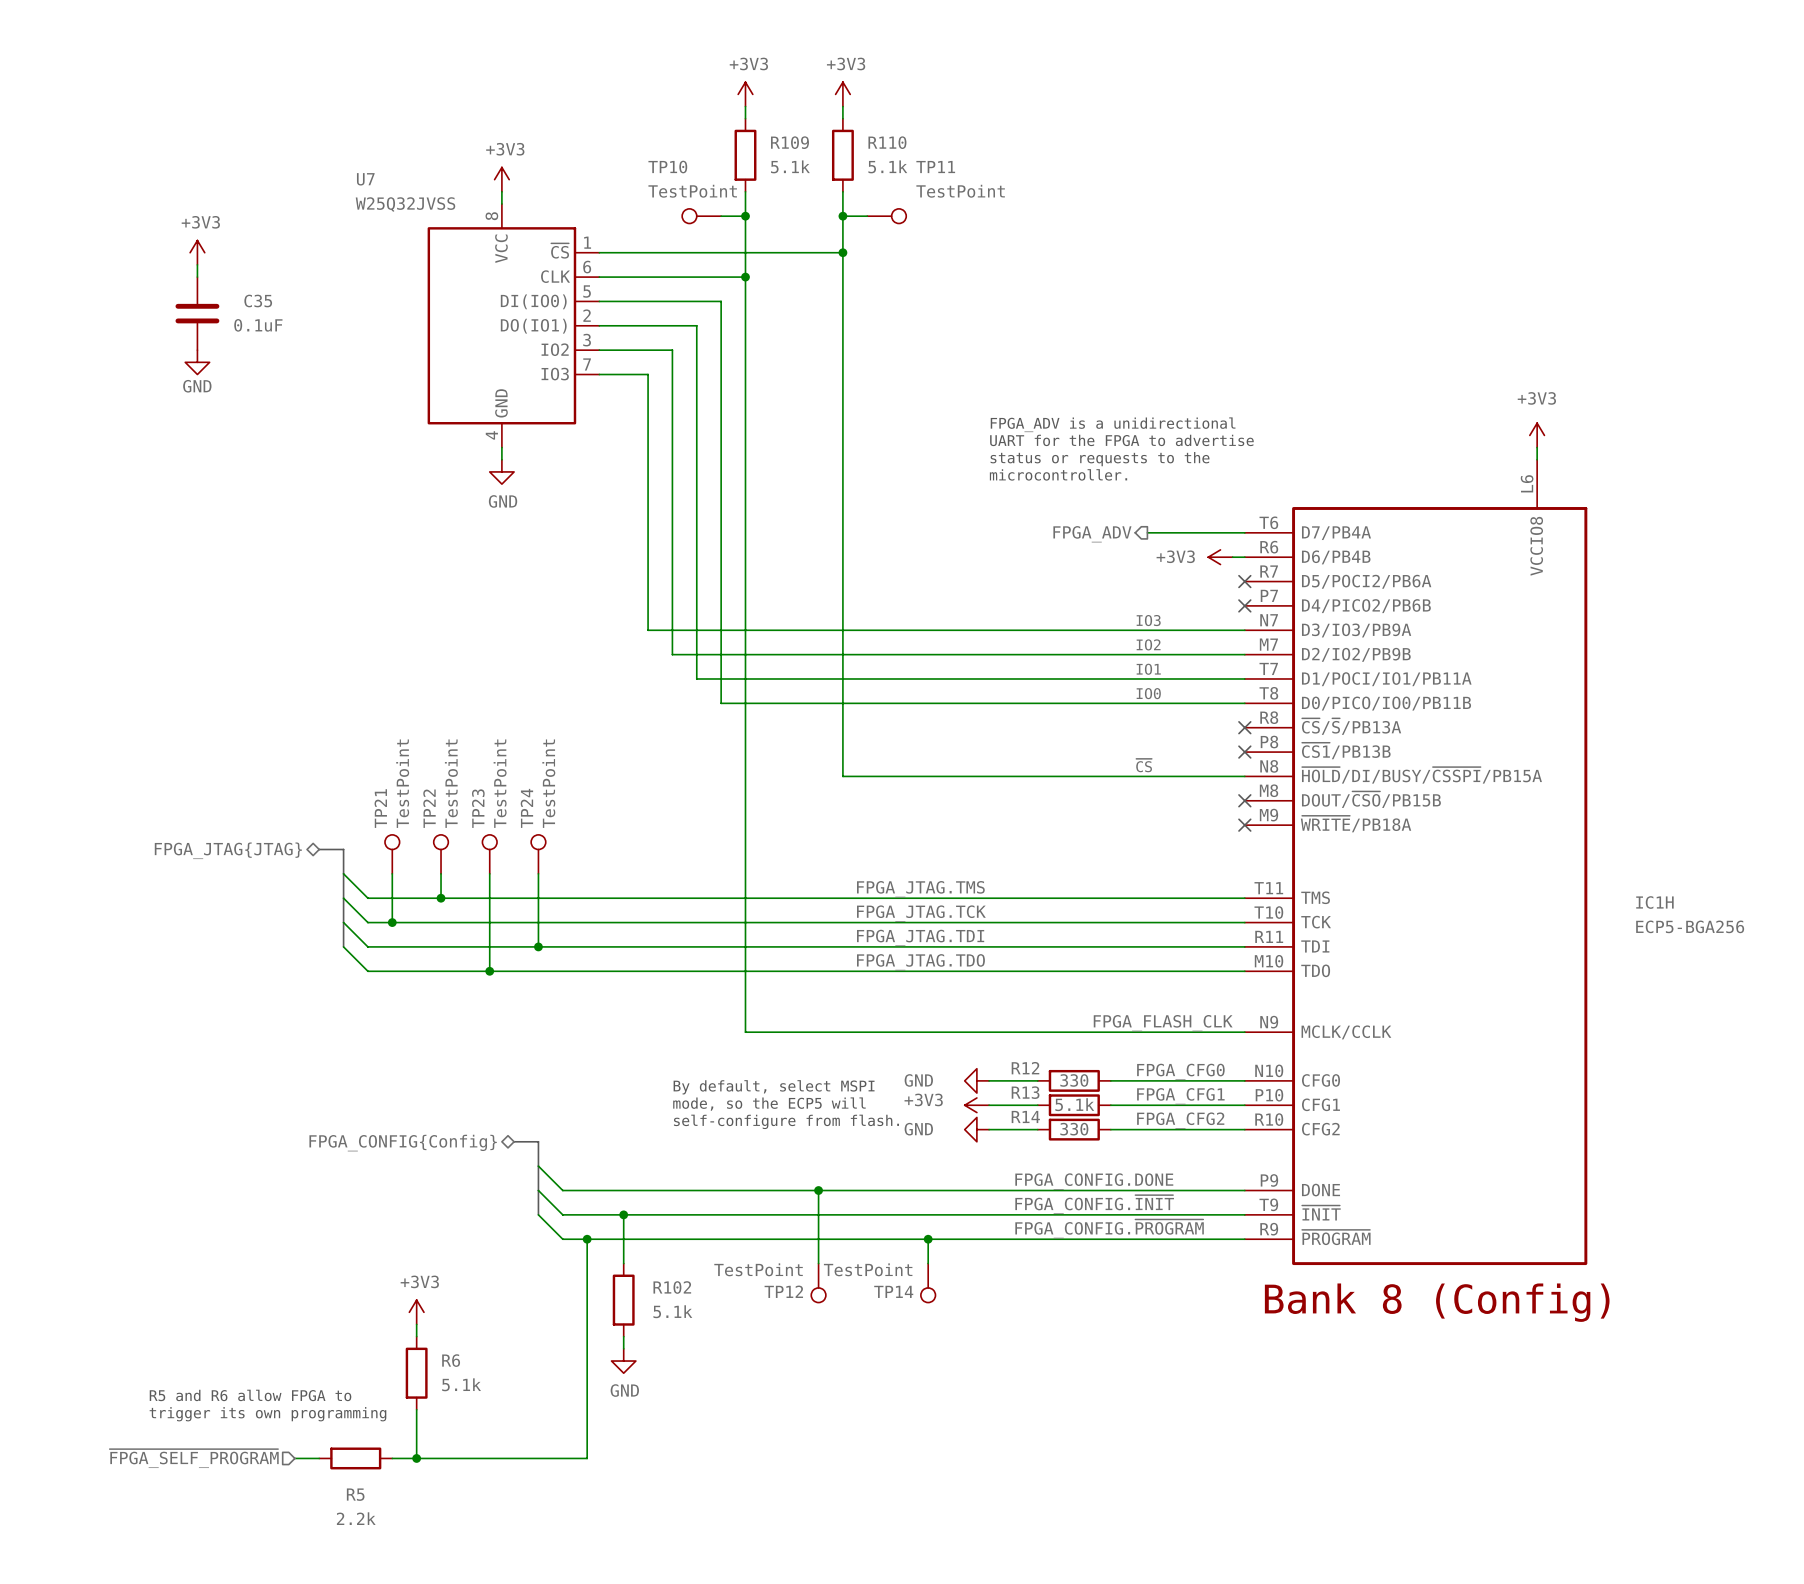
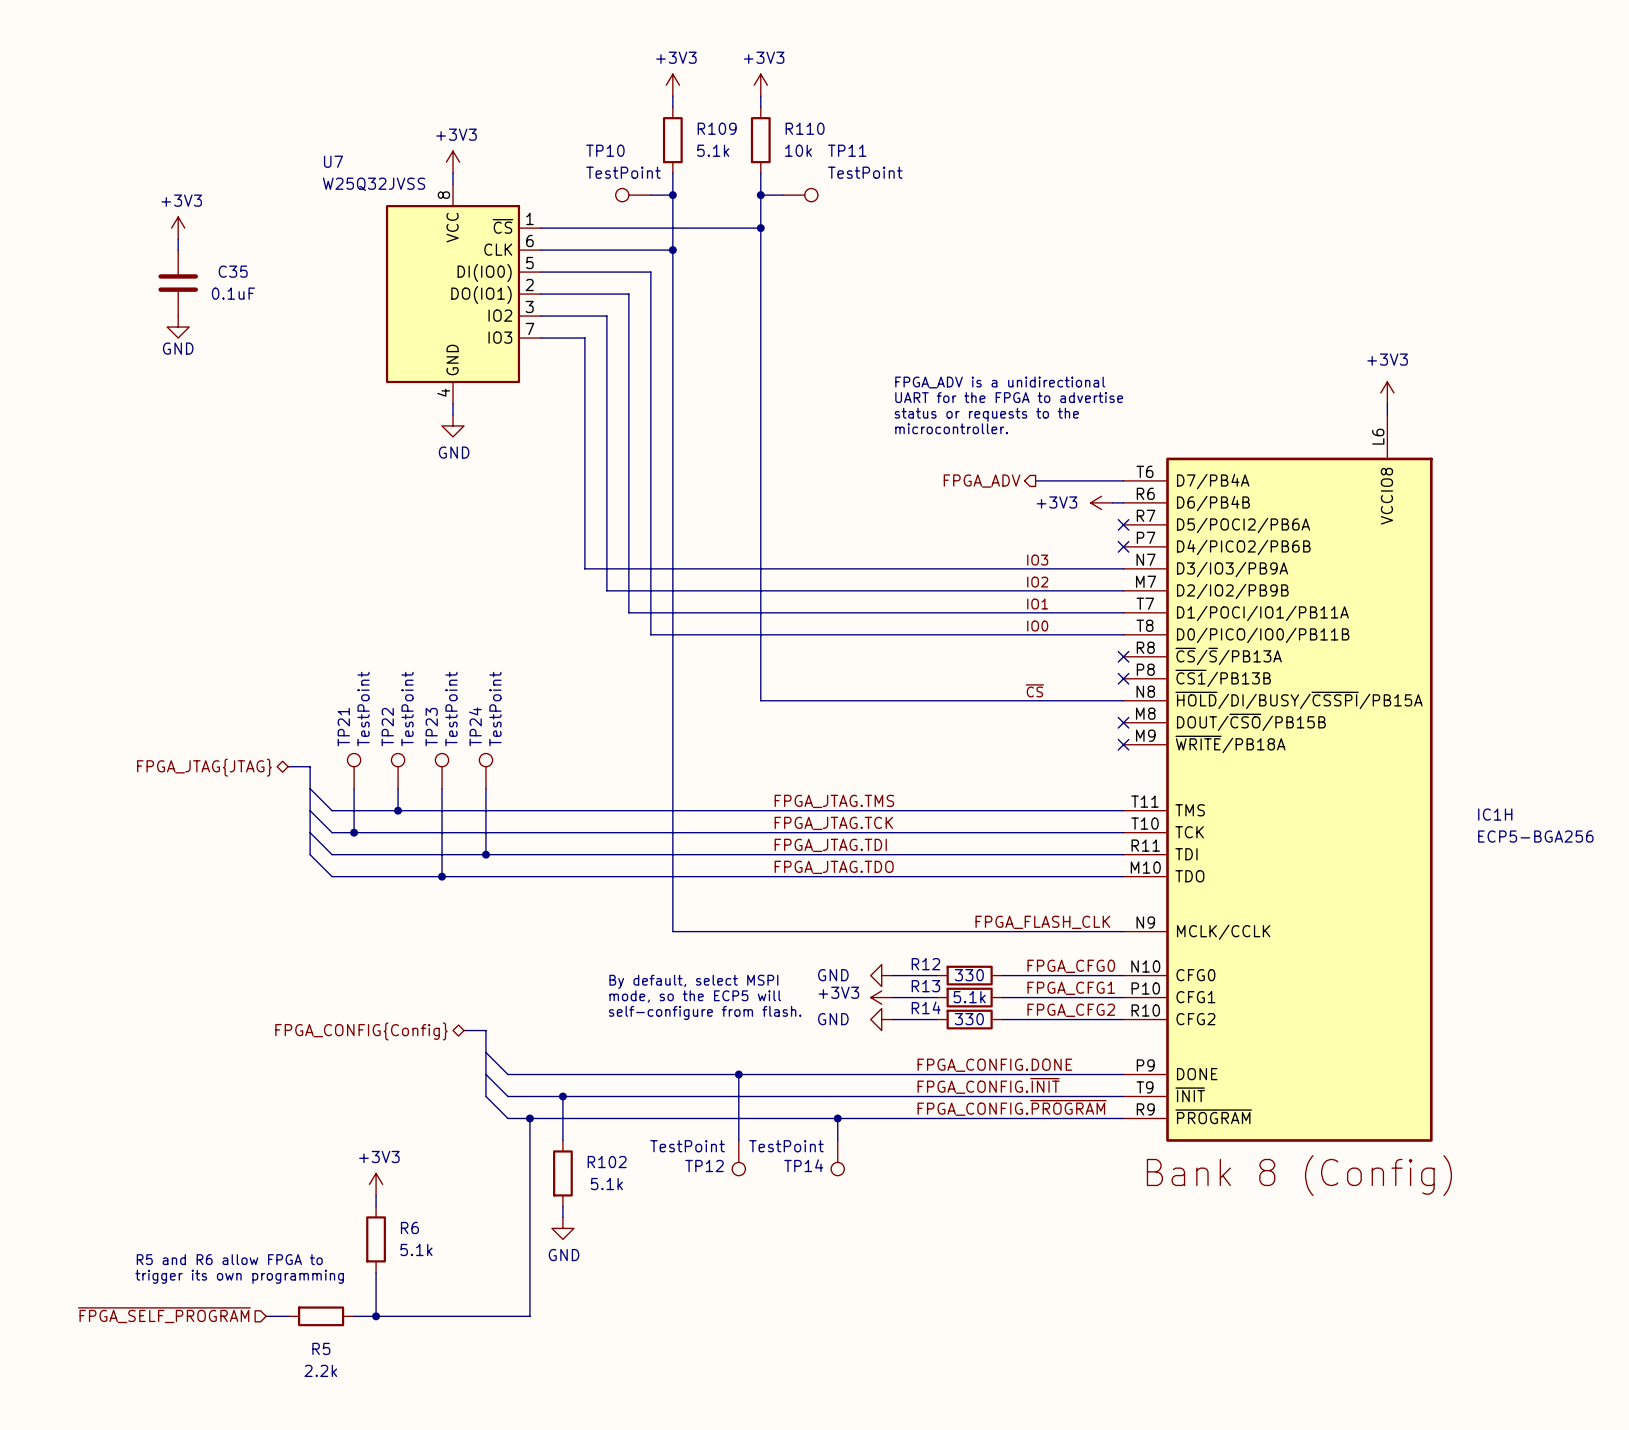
R110 value: 5.1k (887, 166) -> 10k (798, 150)

